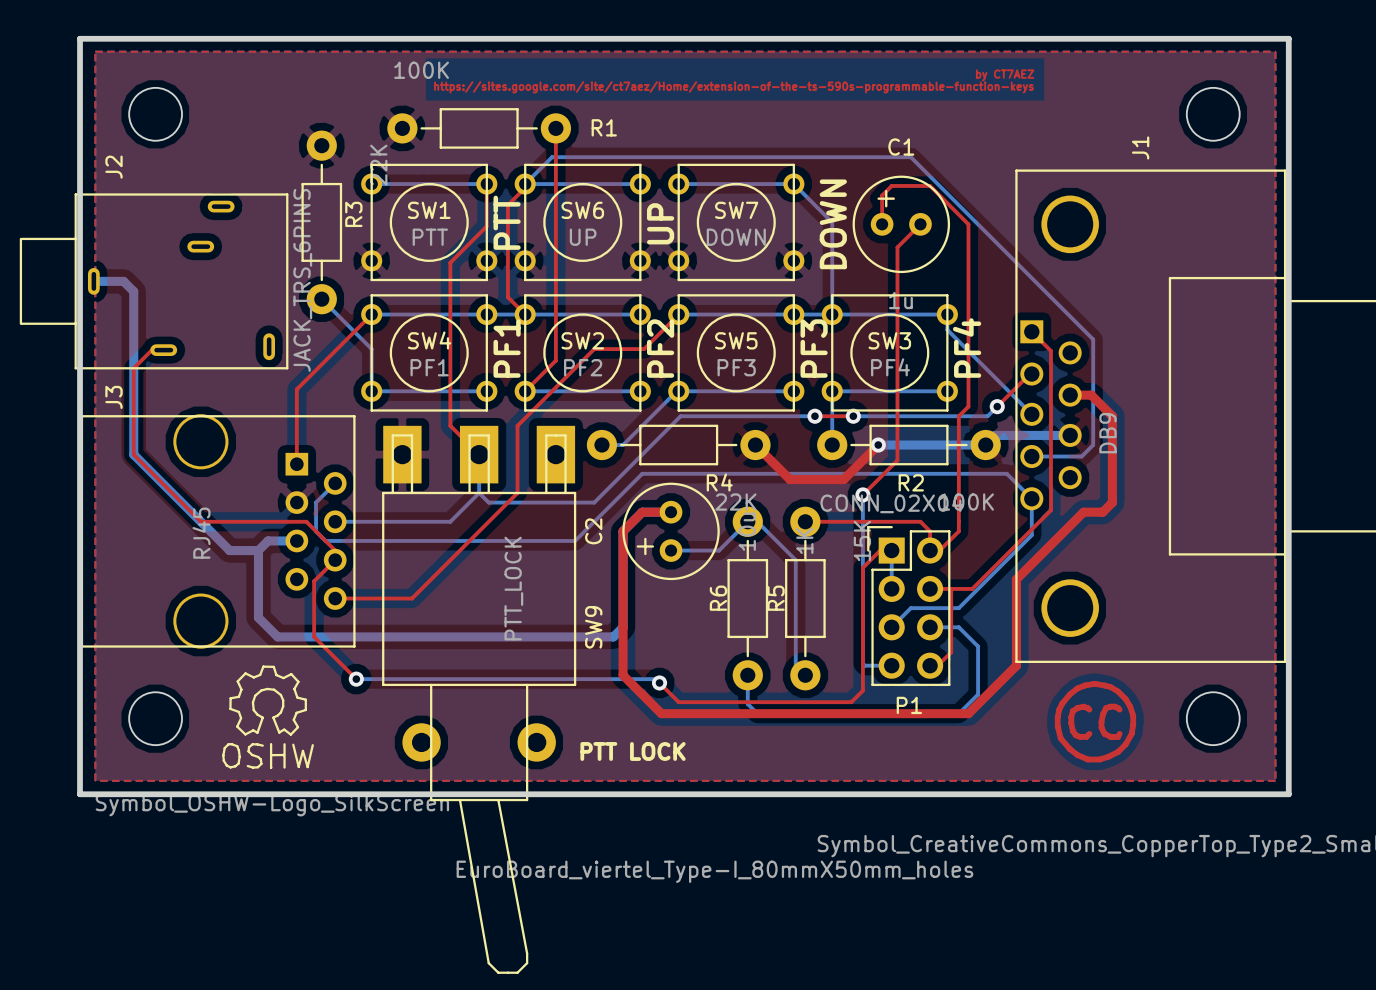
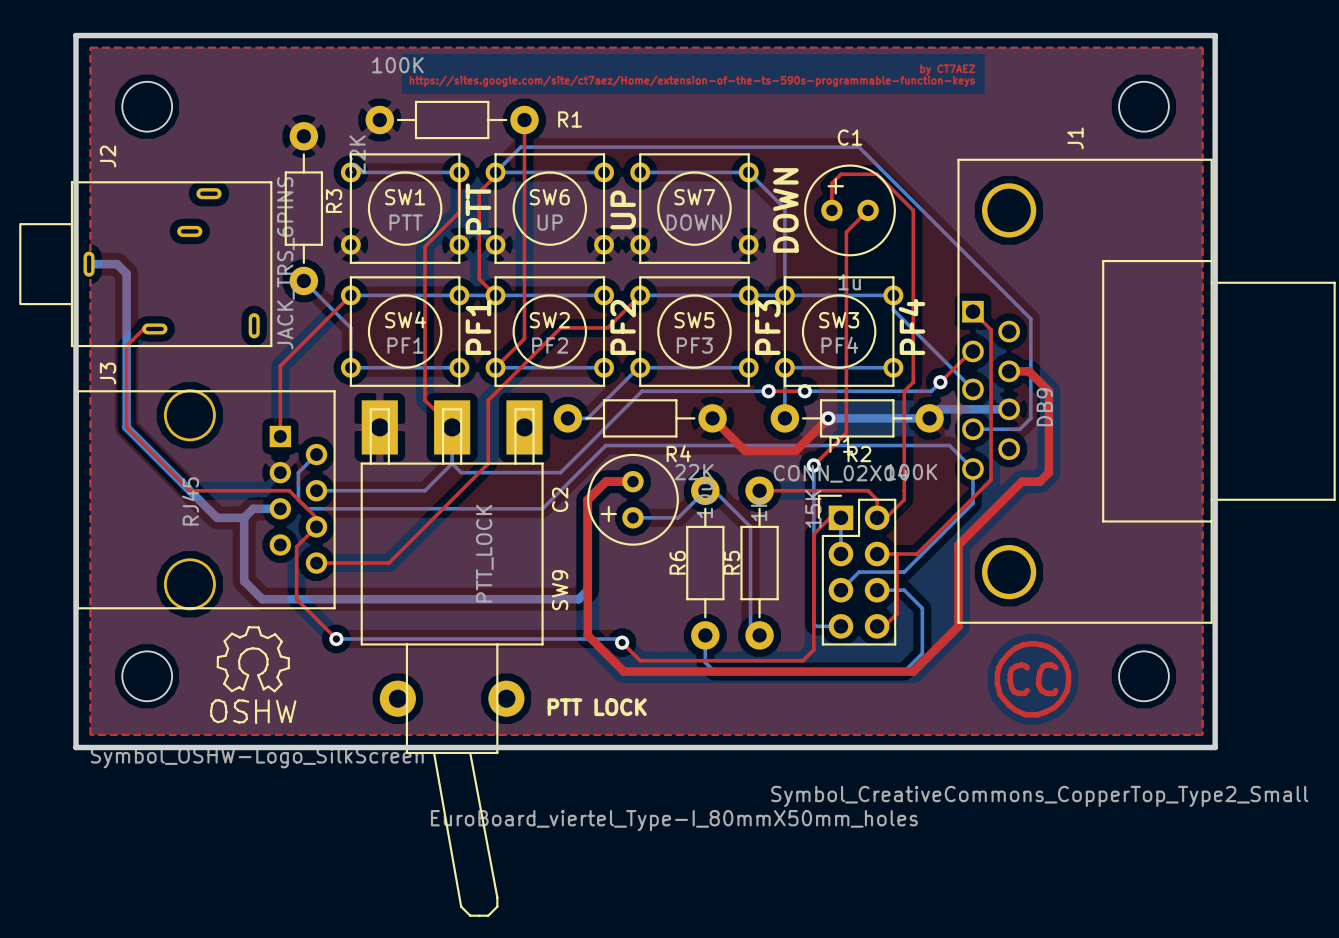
P1 name position: P1 (909, 705) -> P1 (841, 444)

